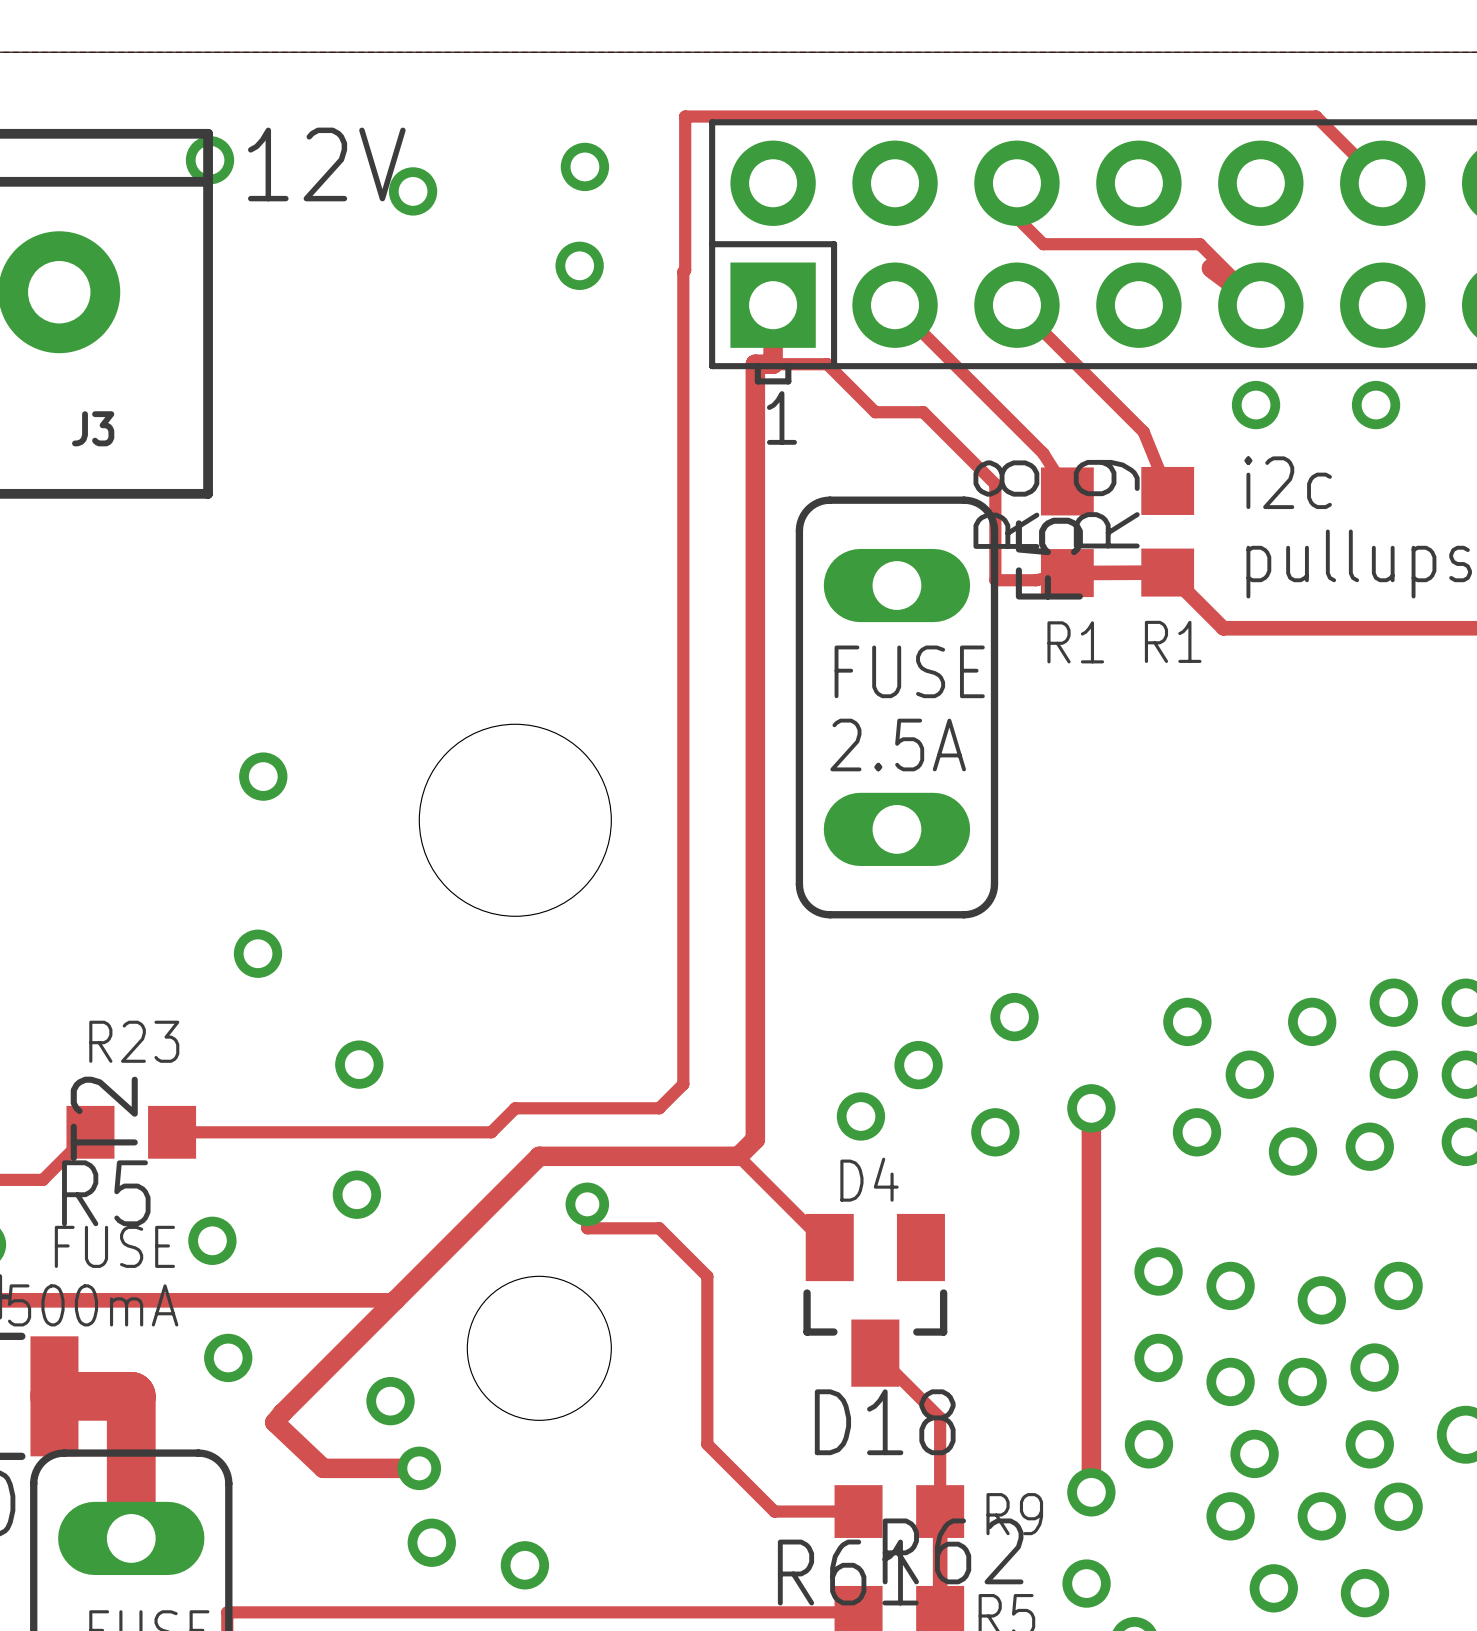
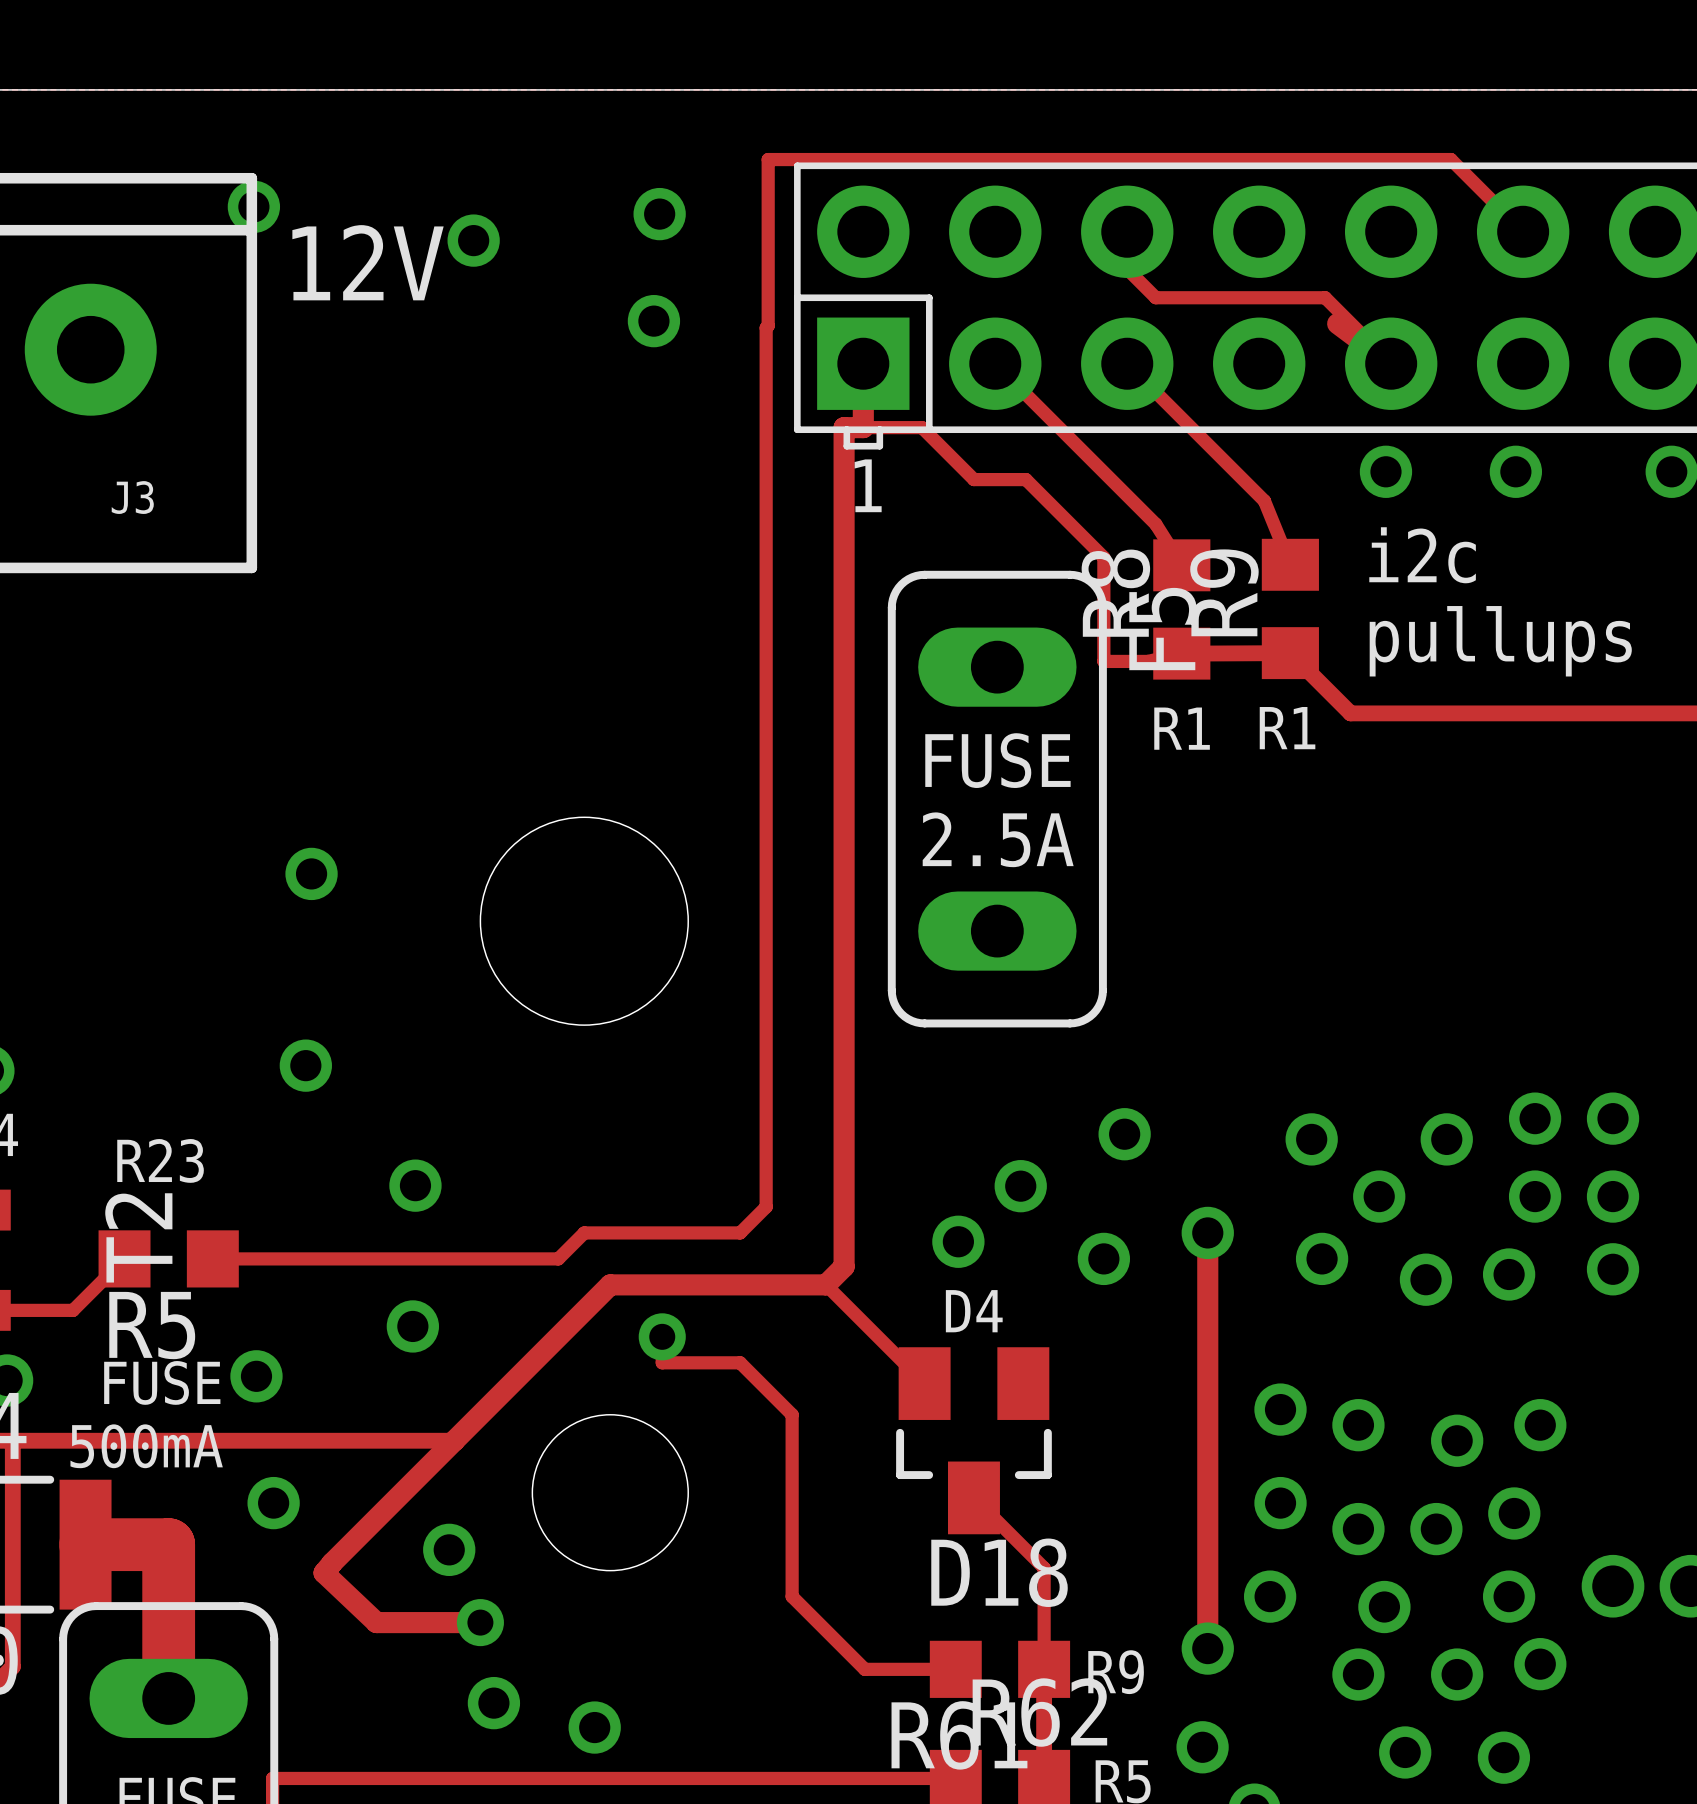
text position: 12V (326, 164) -> 12V (368, 262)

